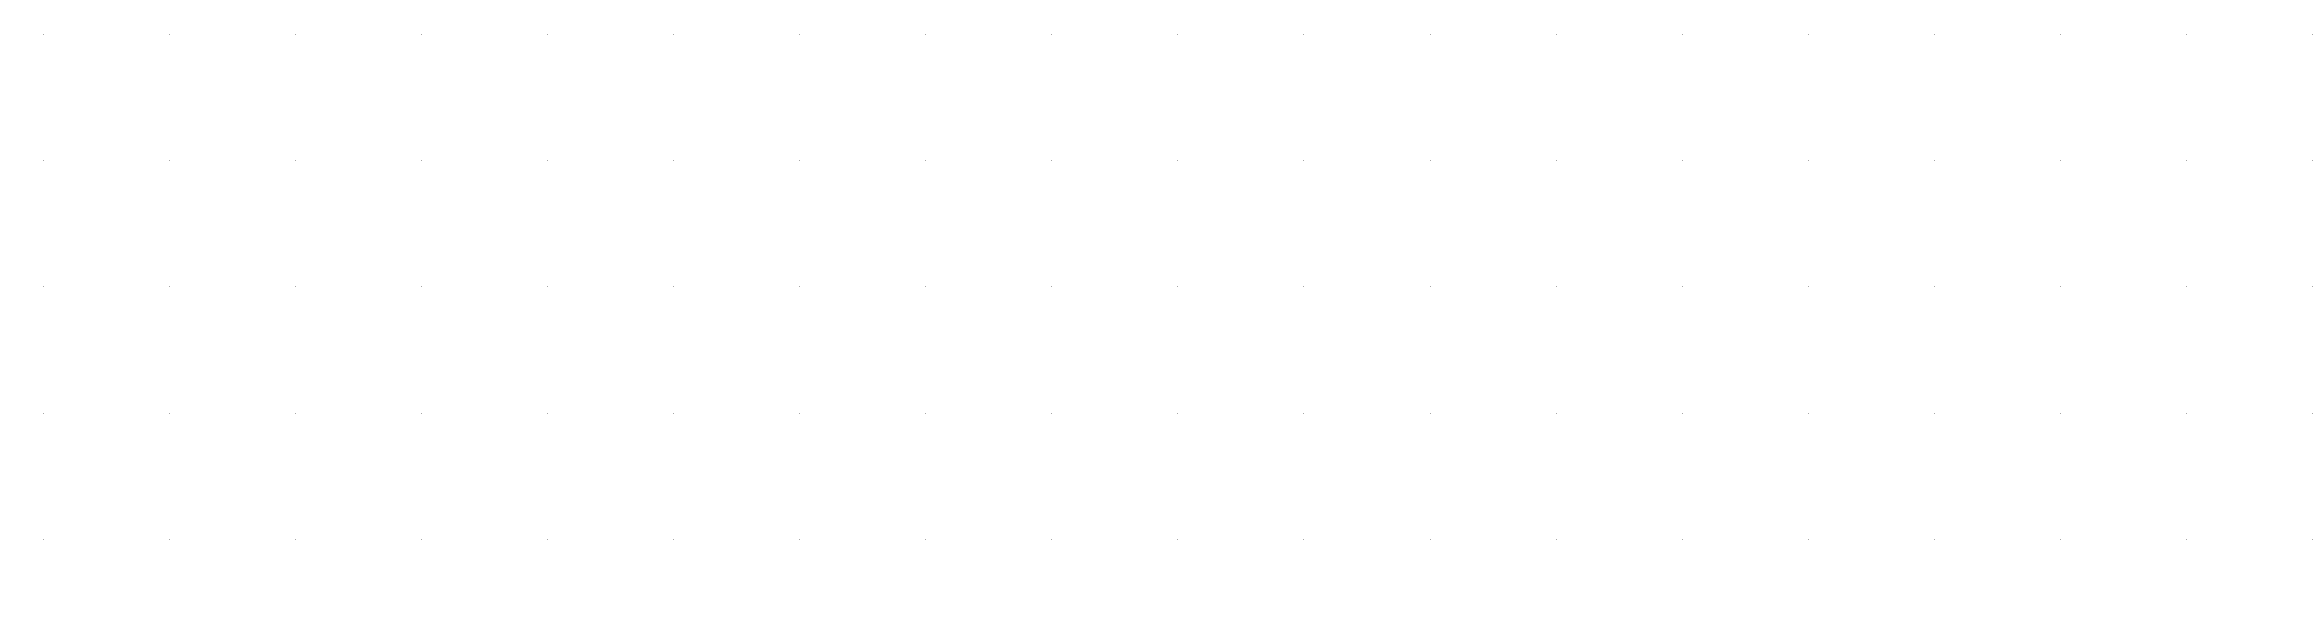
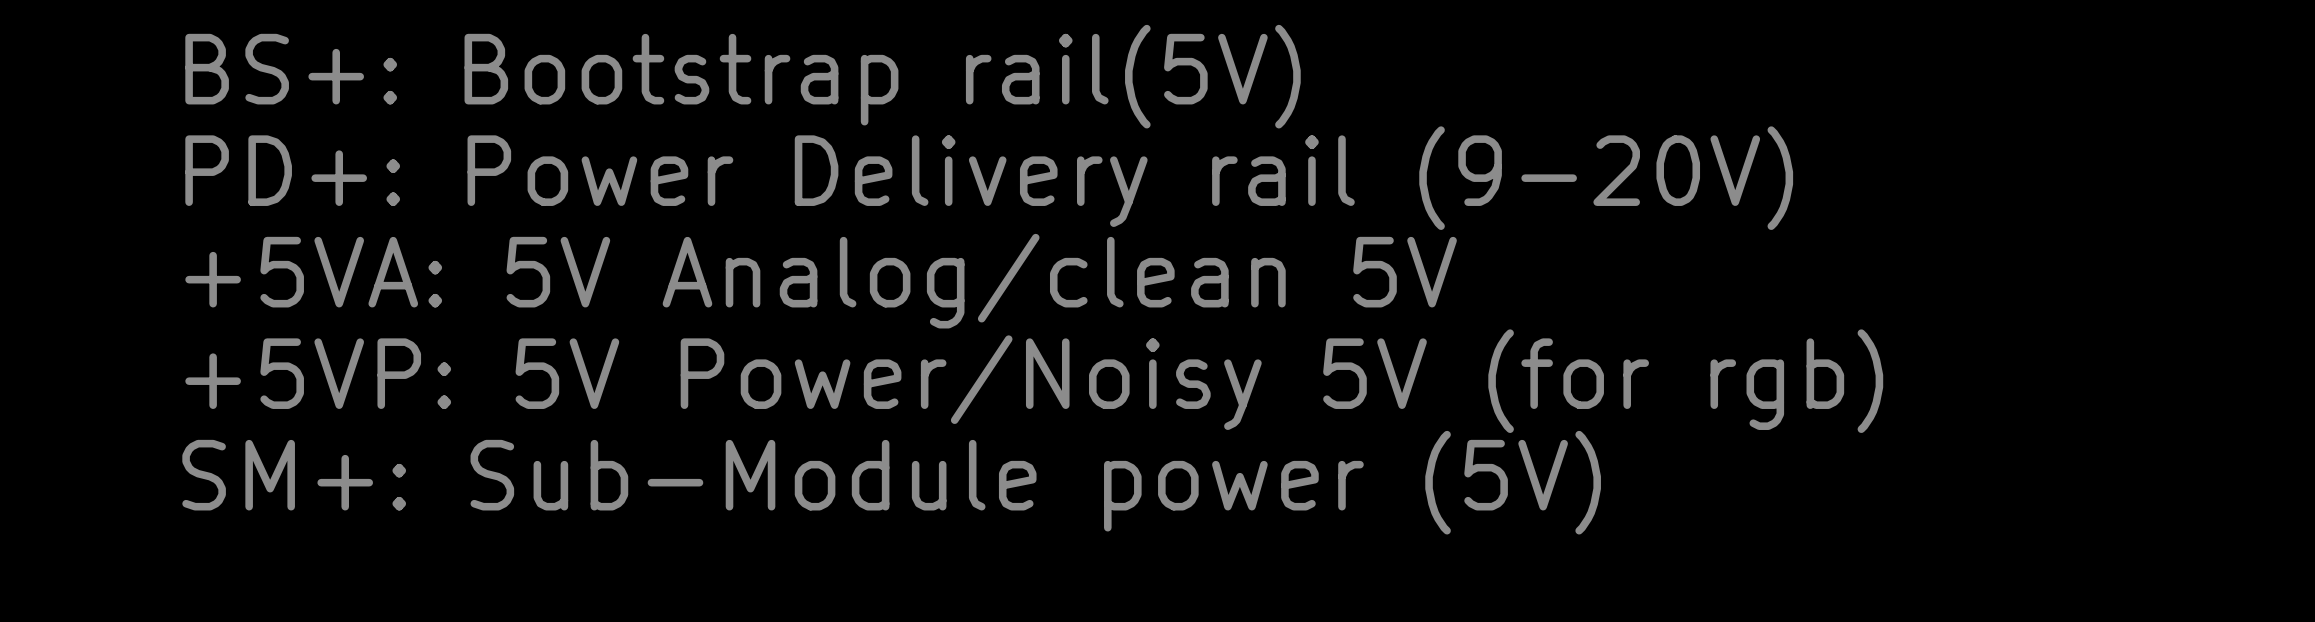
text: none -> BS+: Bootstrap rail(5V) (743, 76)
text: none -> PD+: Power Delivery rail (9-20V) (989, 178)
text: none -> +5VA: 5V Analog/clean 5V (821, 281)
text: none -> +5VP: 5V Power/Noisy 5V (for rgb) (1034, 381)
text: none -> SM+: Sub-Module power (5V) (891, 482)

